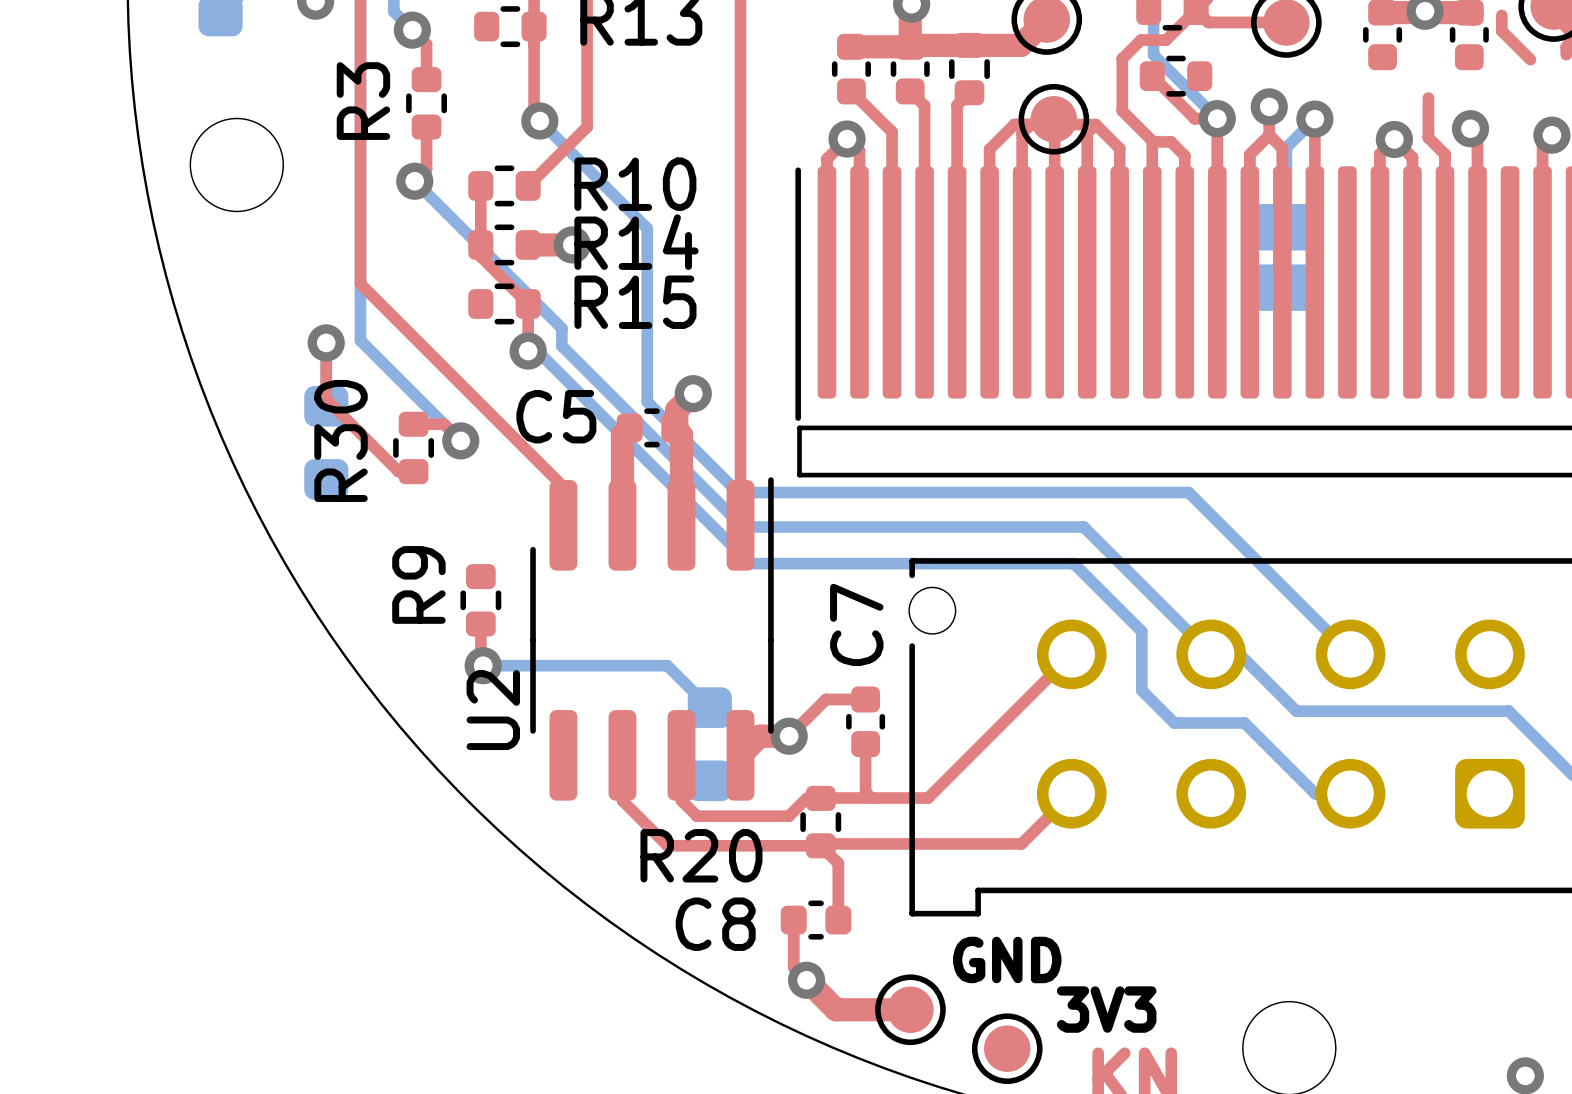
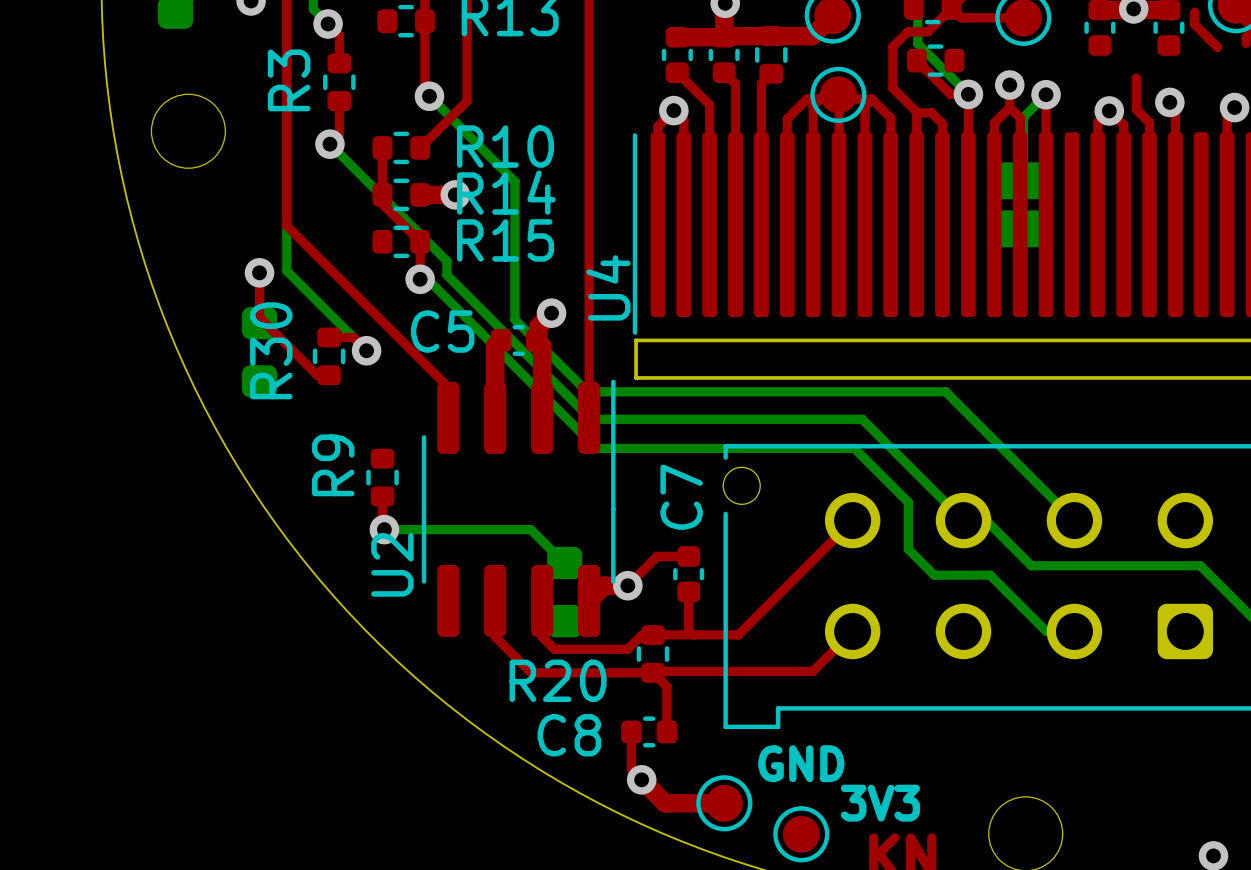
U4 name: none -> U4 (608, 287)

